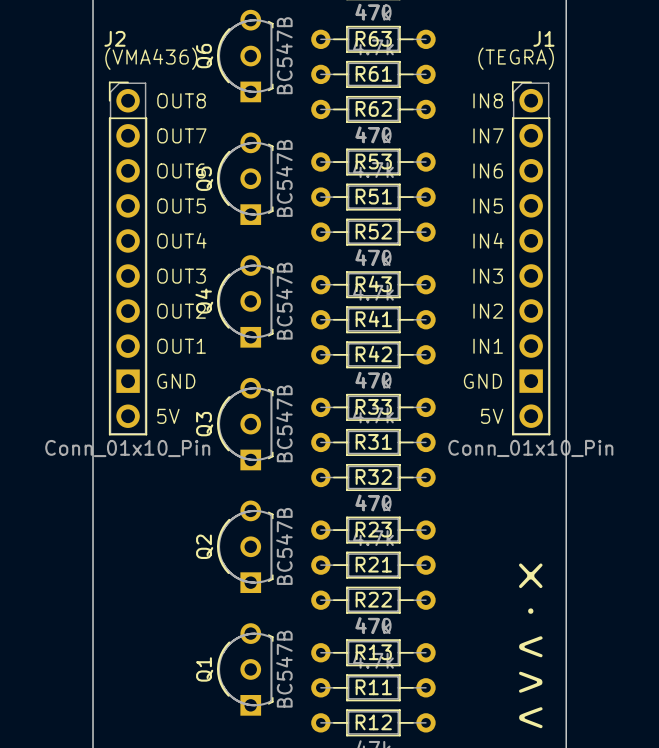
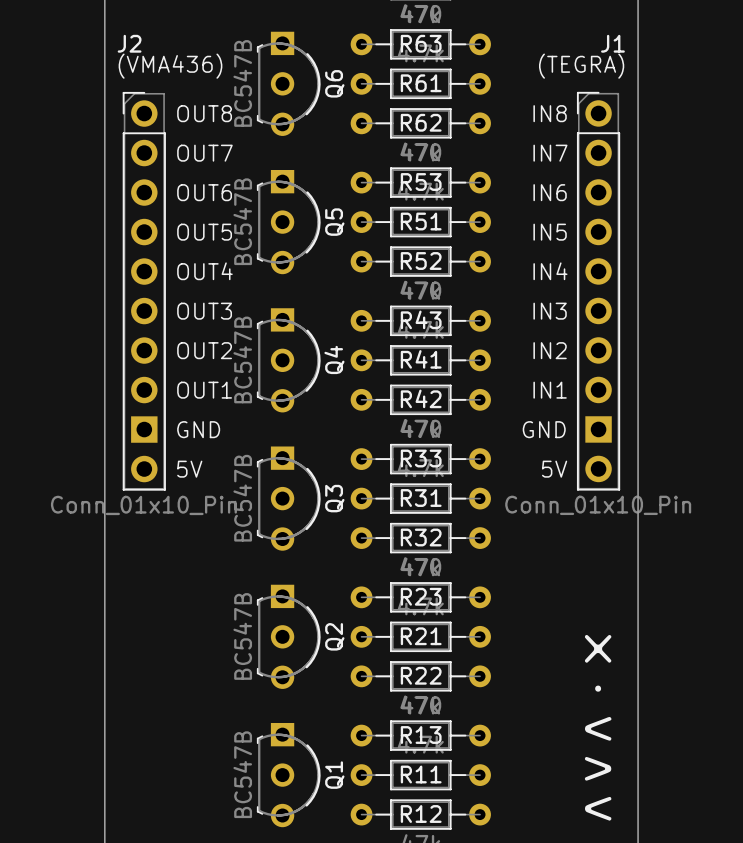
Q6 rotation: 0° (245, 56) -> 180° (288, 83)
Q5 rotation: 0° (245, 178) -> 180° (288, 222)
Q4 rotation: 0° (245, 301) -> 180° (288, 360)
Q3 rotation: 0° (245, 424) -> 180° (288, 498)
Q2 rotation: 0° (245, 546) -> 180° (288, 636)
Q1 rotation: 0° (245, 669) -> 180° (288, 775)

